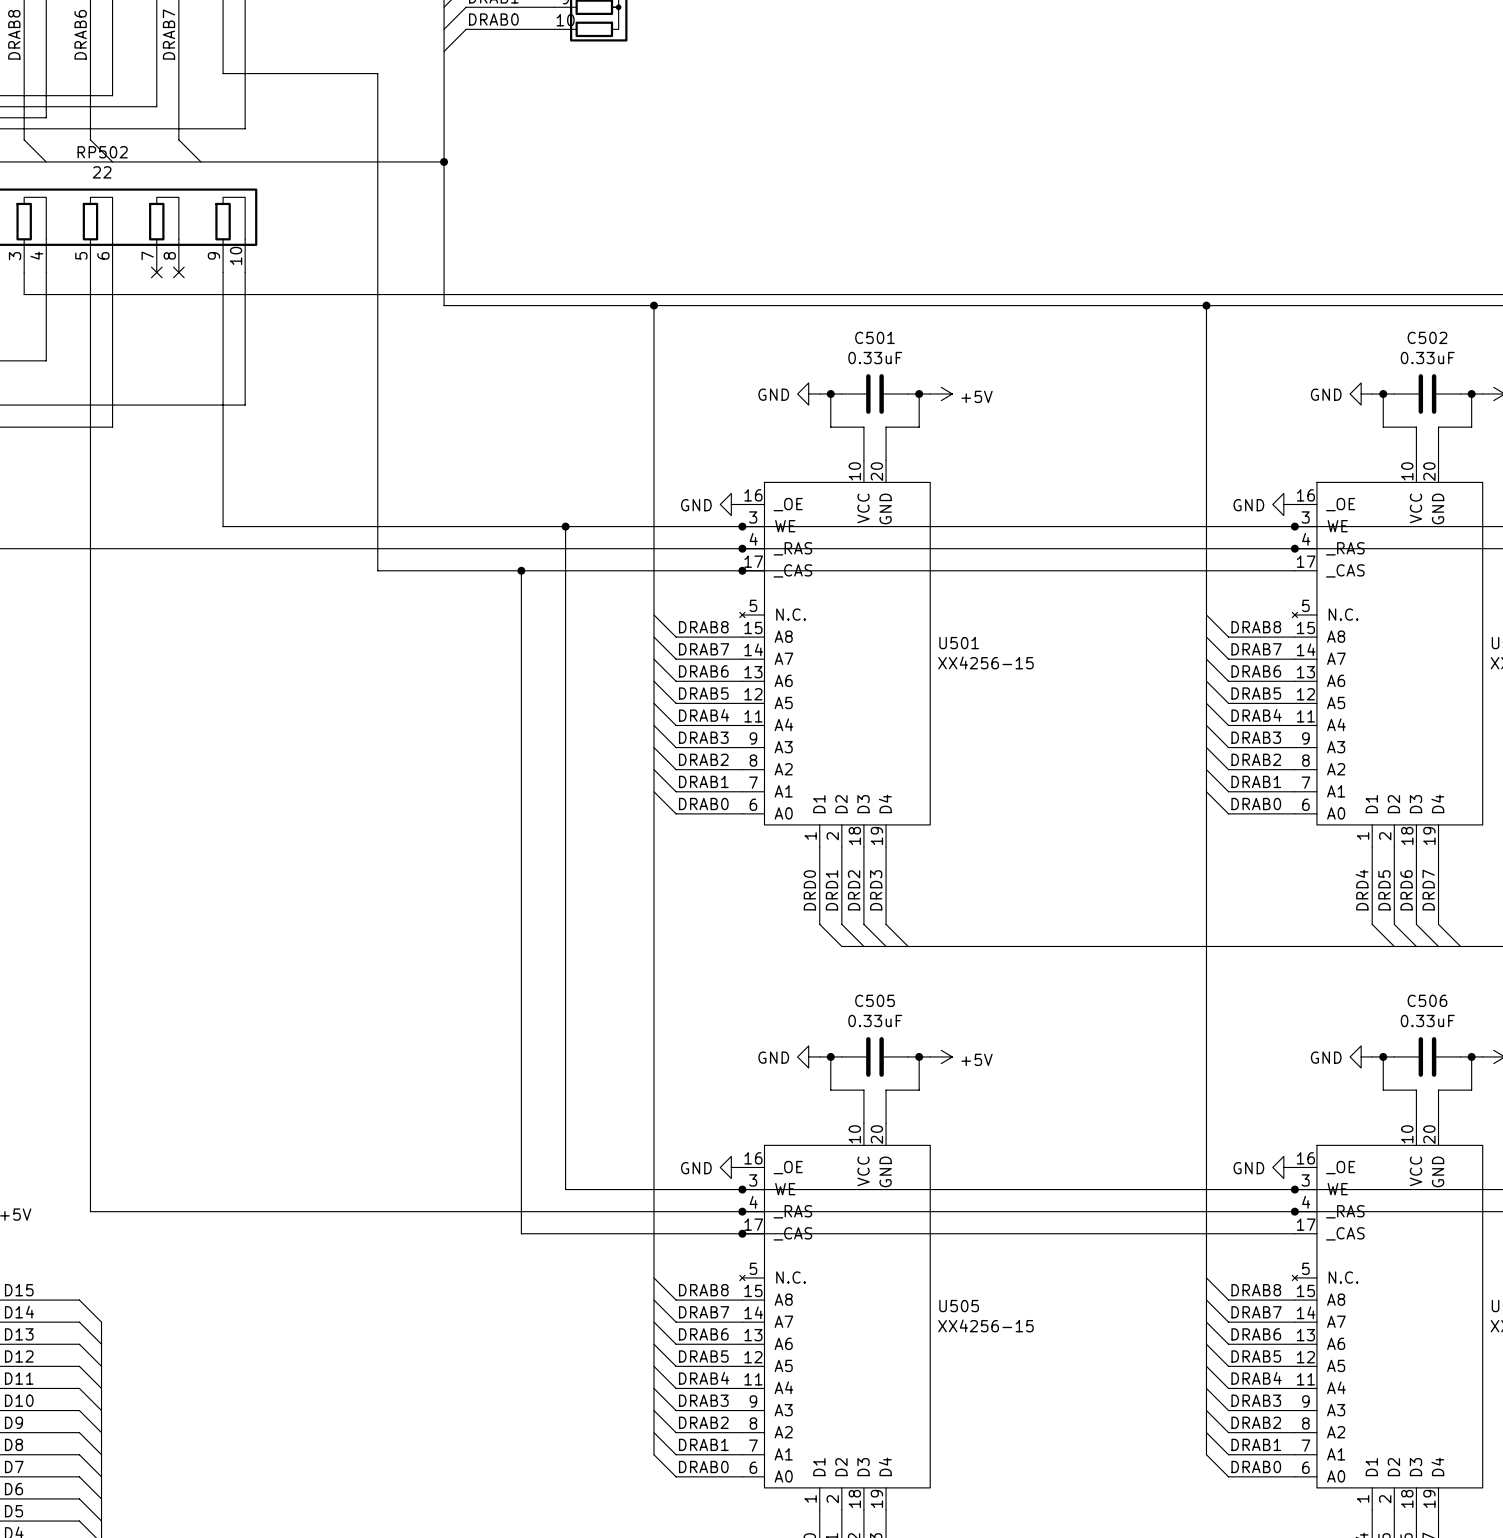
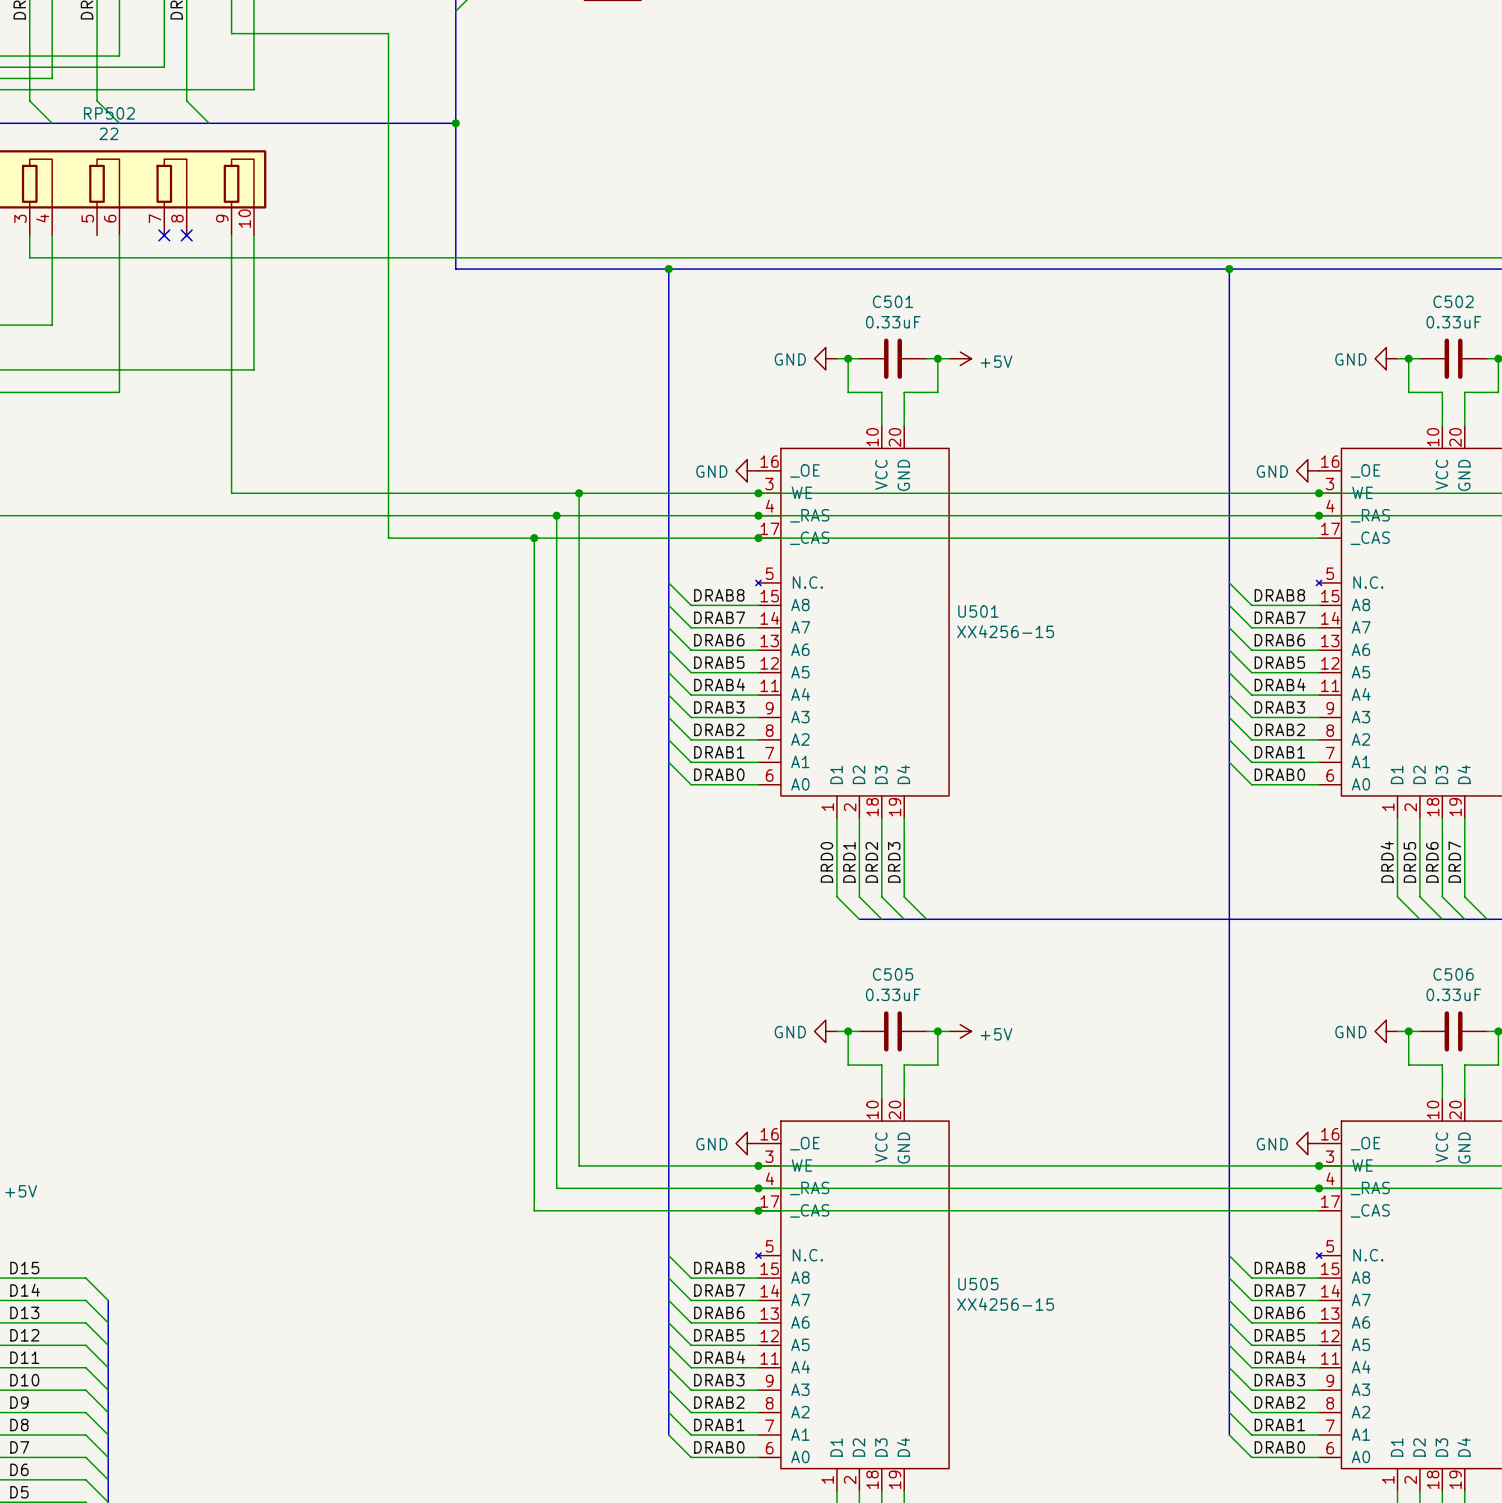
wire: (90, 272) (90, 1211) (543, 1211) -> (556, 515) (556, 1188)
junction: none -> (556, 515)

